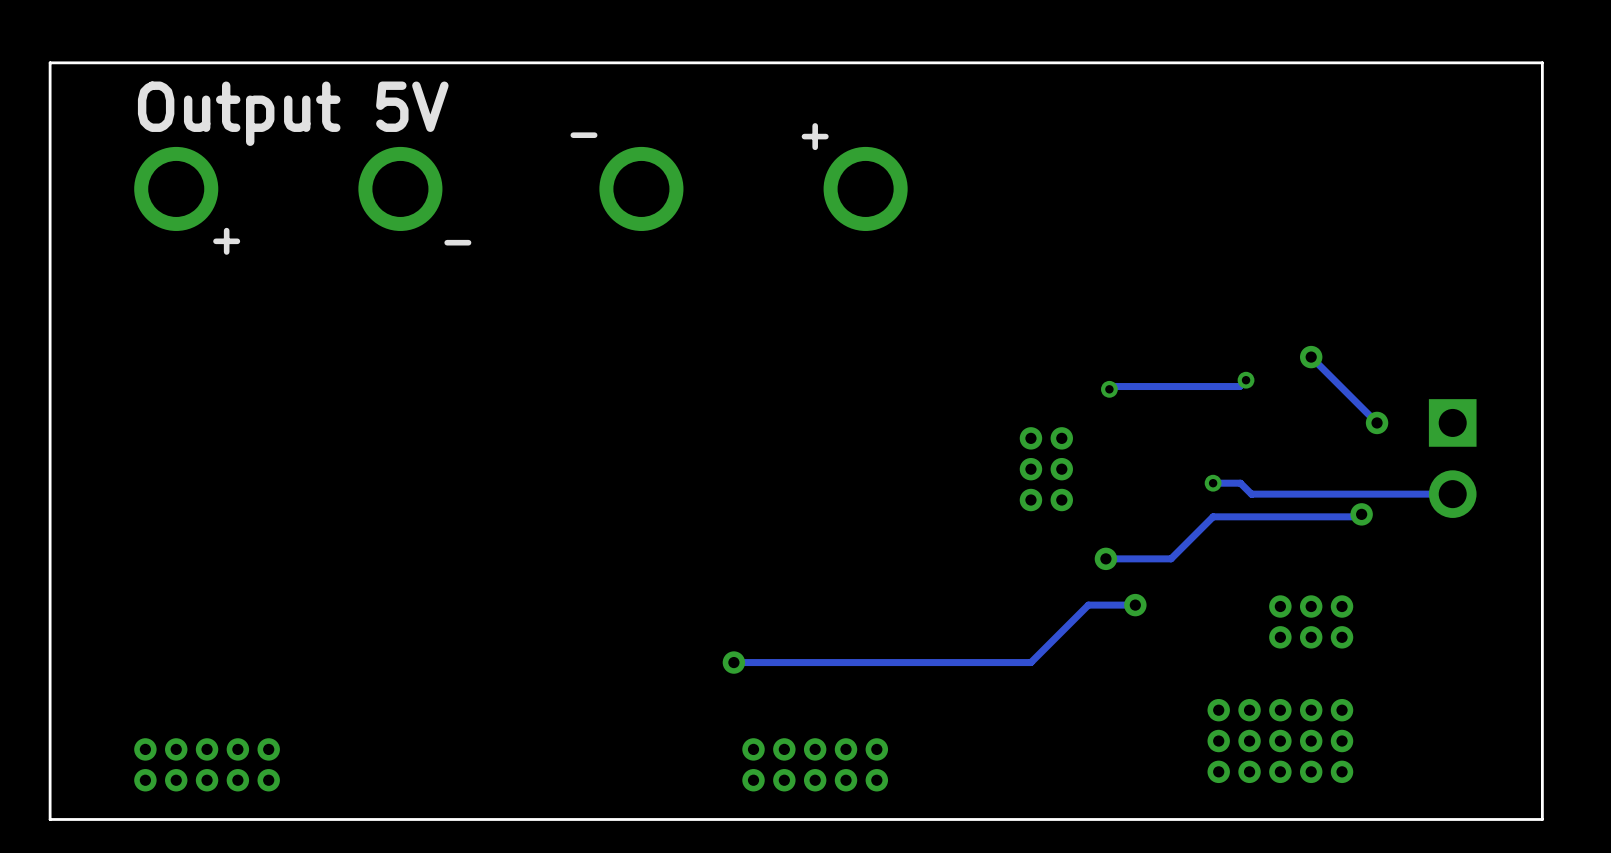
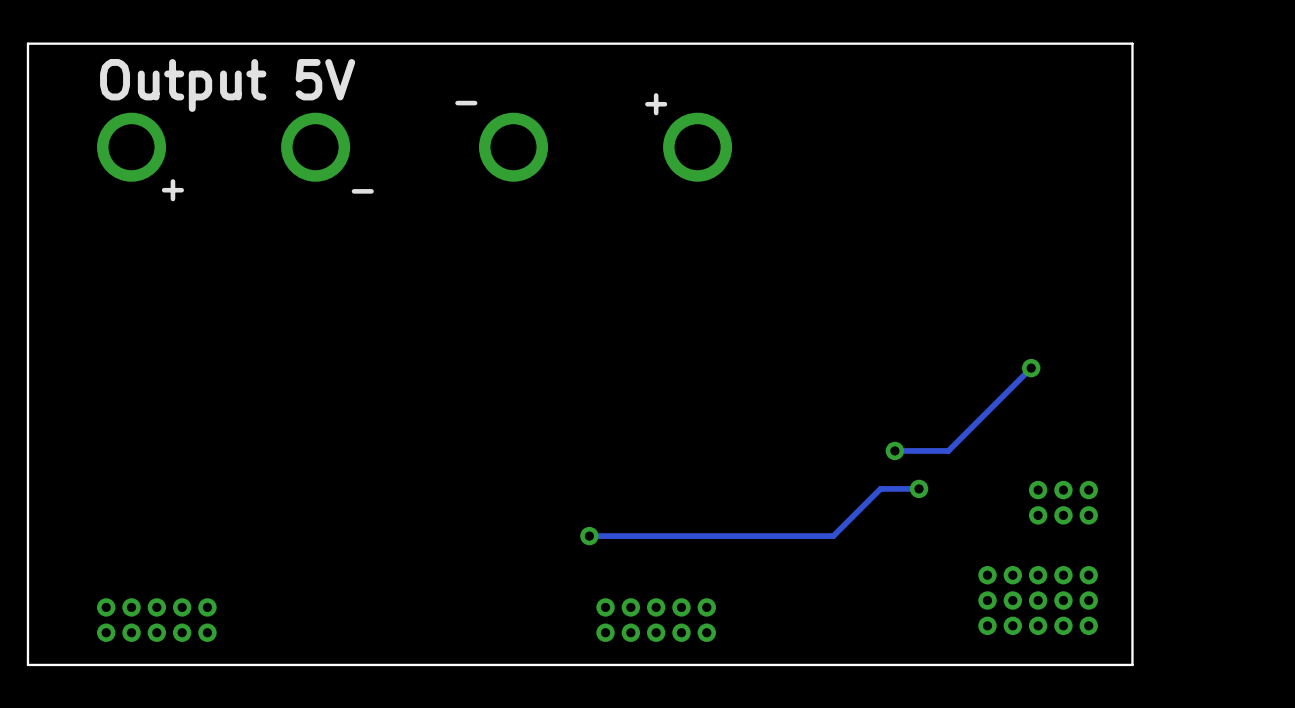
board edge: (1395, 62) (1542, 62) (1542, 819) (1395, 819) -> (1132, 43) (1132, 664)
track: (1311, 357) (1377, 422) -> none
via: (1311, 357) -> none
track: (1246, 380) (1239, 386) (1112, 386) (1109, 389) -> none
via: (1246, 380) -> none
via: (1109, 389) -> none
via: (1377, 422) -> none
via: (1030, 438) -> none
via: (1061, 438) -> none
via: none -> (1031, 368)
part: (1452, 458) -> none
via: (1030, 469) -> none
via: (1061, 469) -> none
track: (1213, 483) (1240, 483) (1251, 494) -> none
via: (1213, 483) -> none
track: (1452, 494) (1251, 494) -> none
via: (1030, 500) -> none
via: (1061, 500) -> none
track: (1361, 514) (1359, 516) (1213, 516) -> (1031, 368) (982, 416)
via: (1361, 514) -> none

